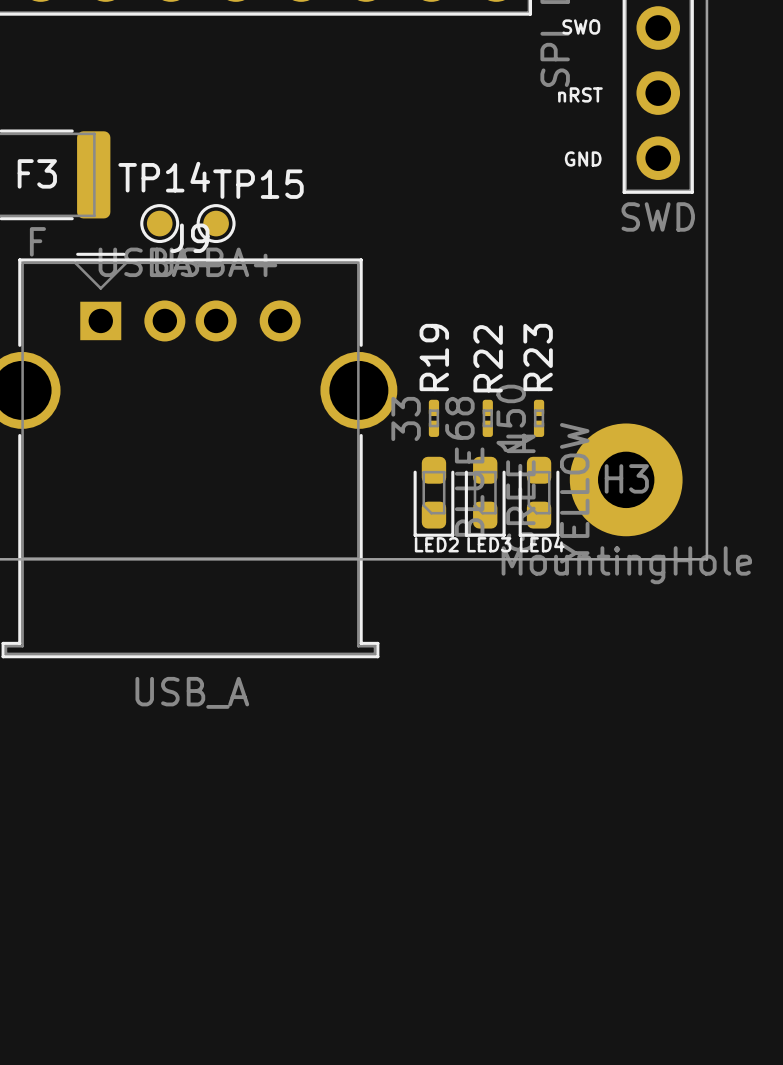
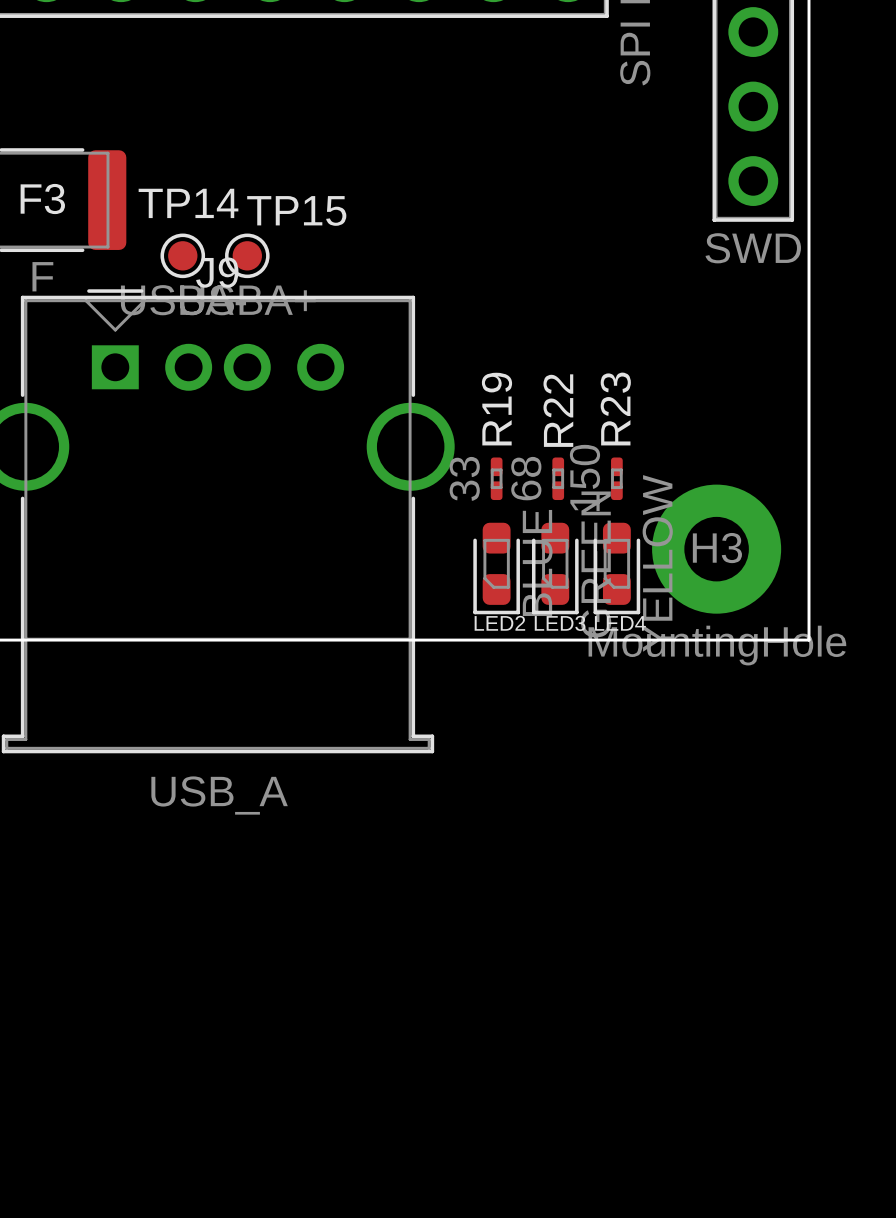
text: SWO (581, 27) -> none
text: nRST (580, 94) -> none
text: GND (583, 159) -> none

